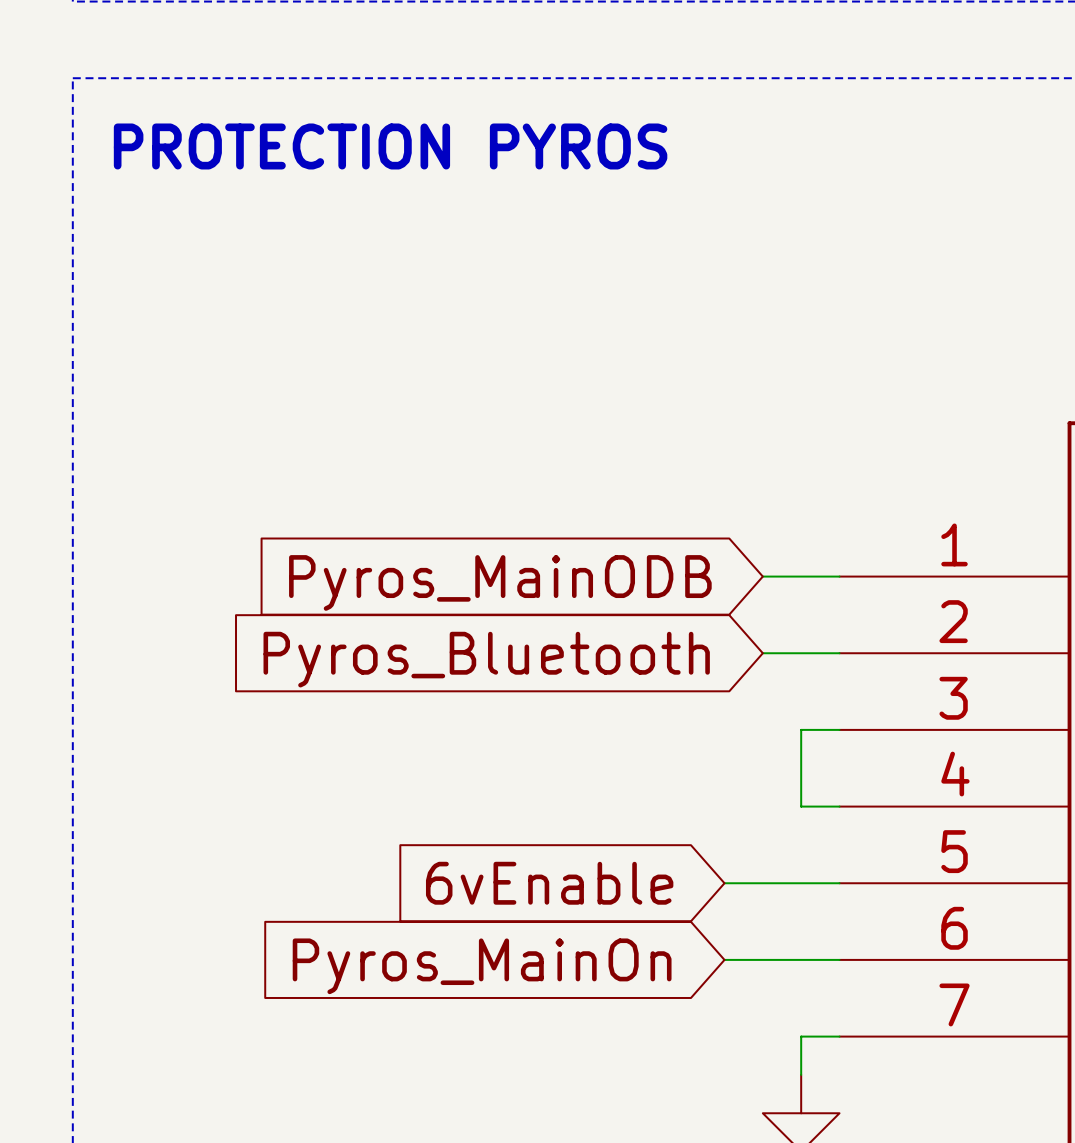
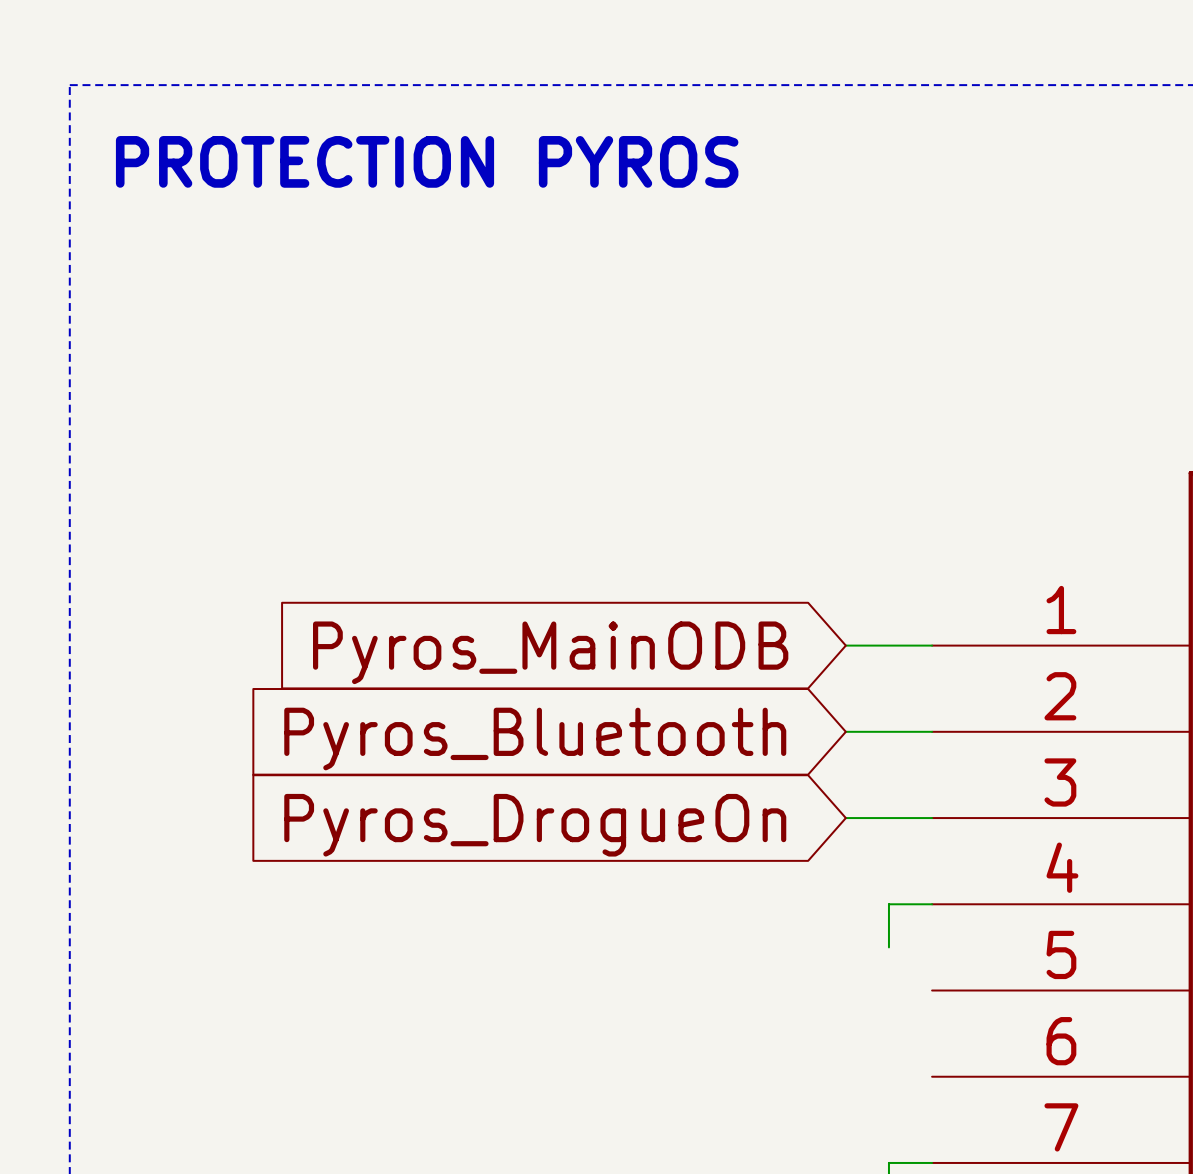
wire: (801, 729) (801, 806) -> (888, 818) (845, 818)
global label: none -> Pyros_DrogueOn (535, 825)
wire: none -> (888, 904) (888, 947)
global label: 6vEnable (549, 883) -> none
wire: (724, 883) (839, 883) -> none
wire: (724, 959) (839, 959) -> none
global label: Pyros_MainOn (482, 966) -> none

